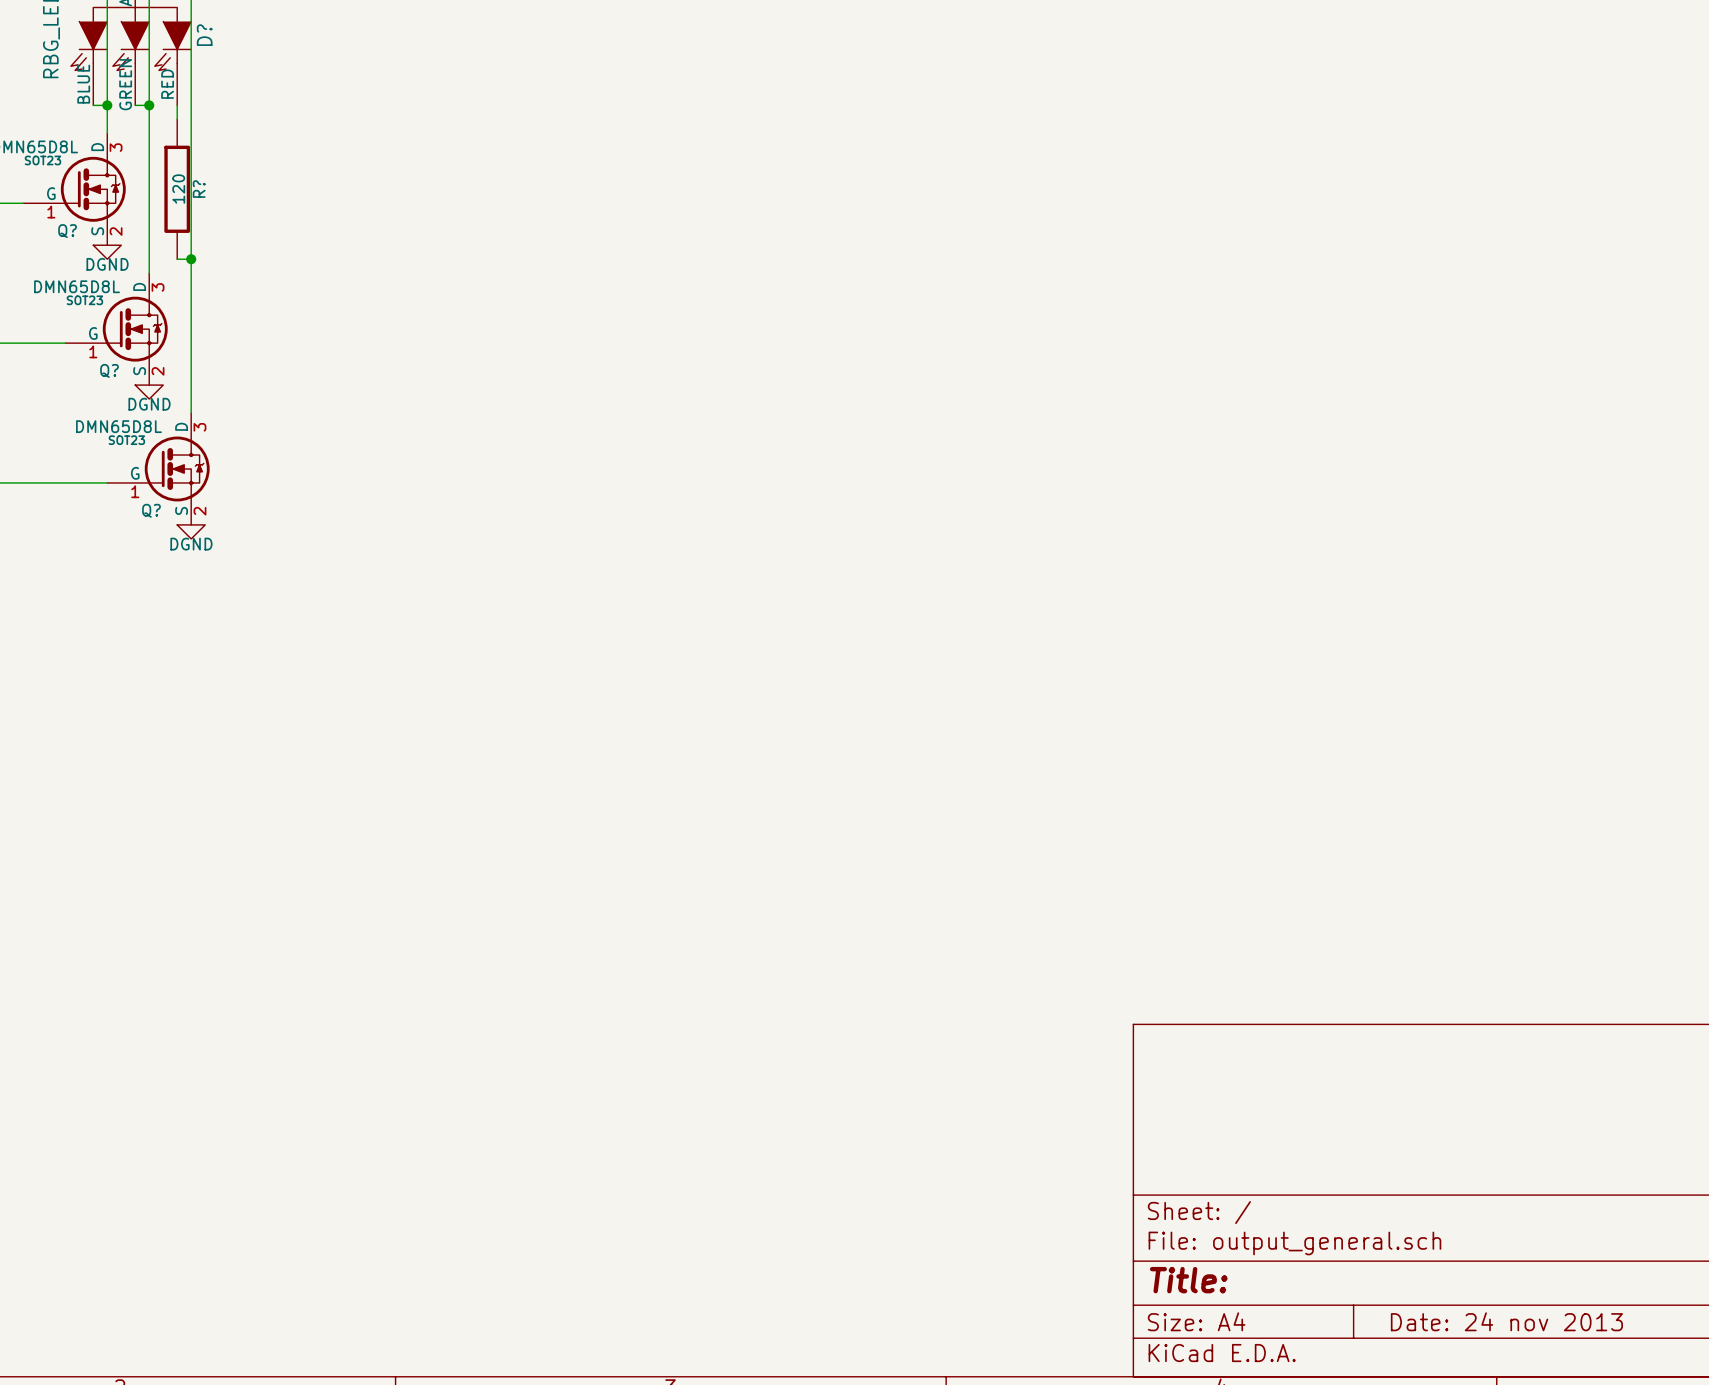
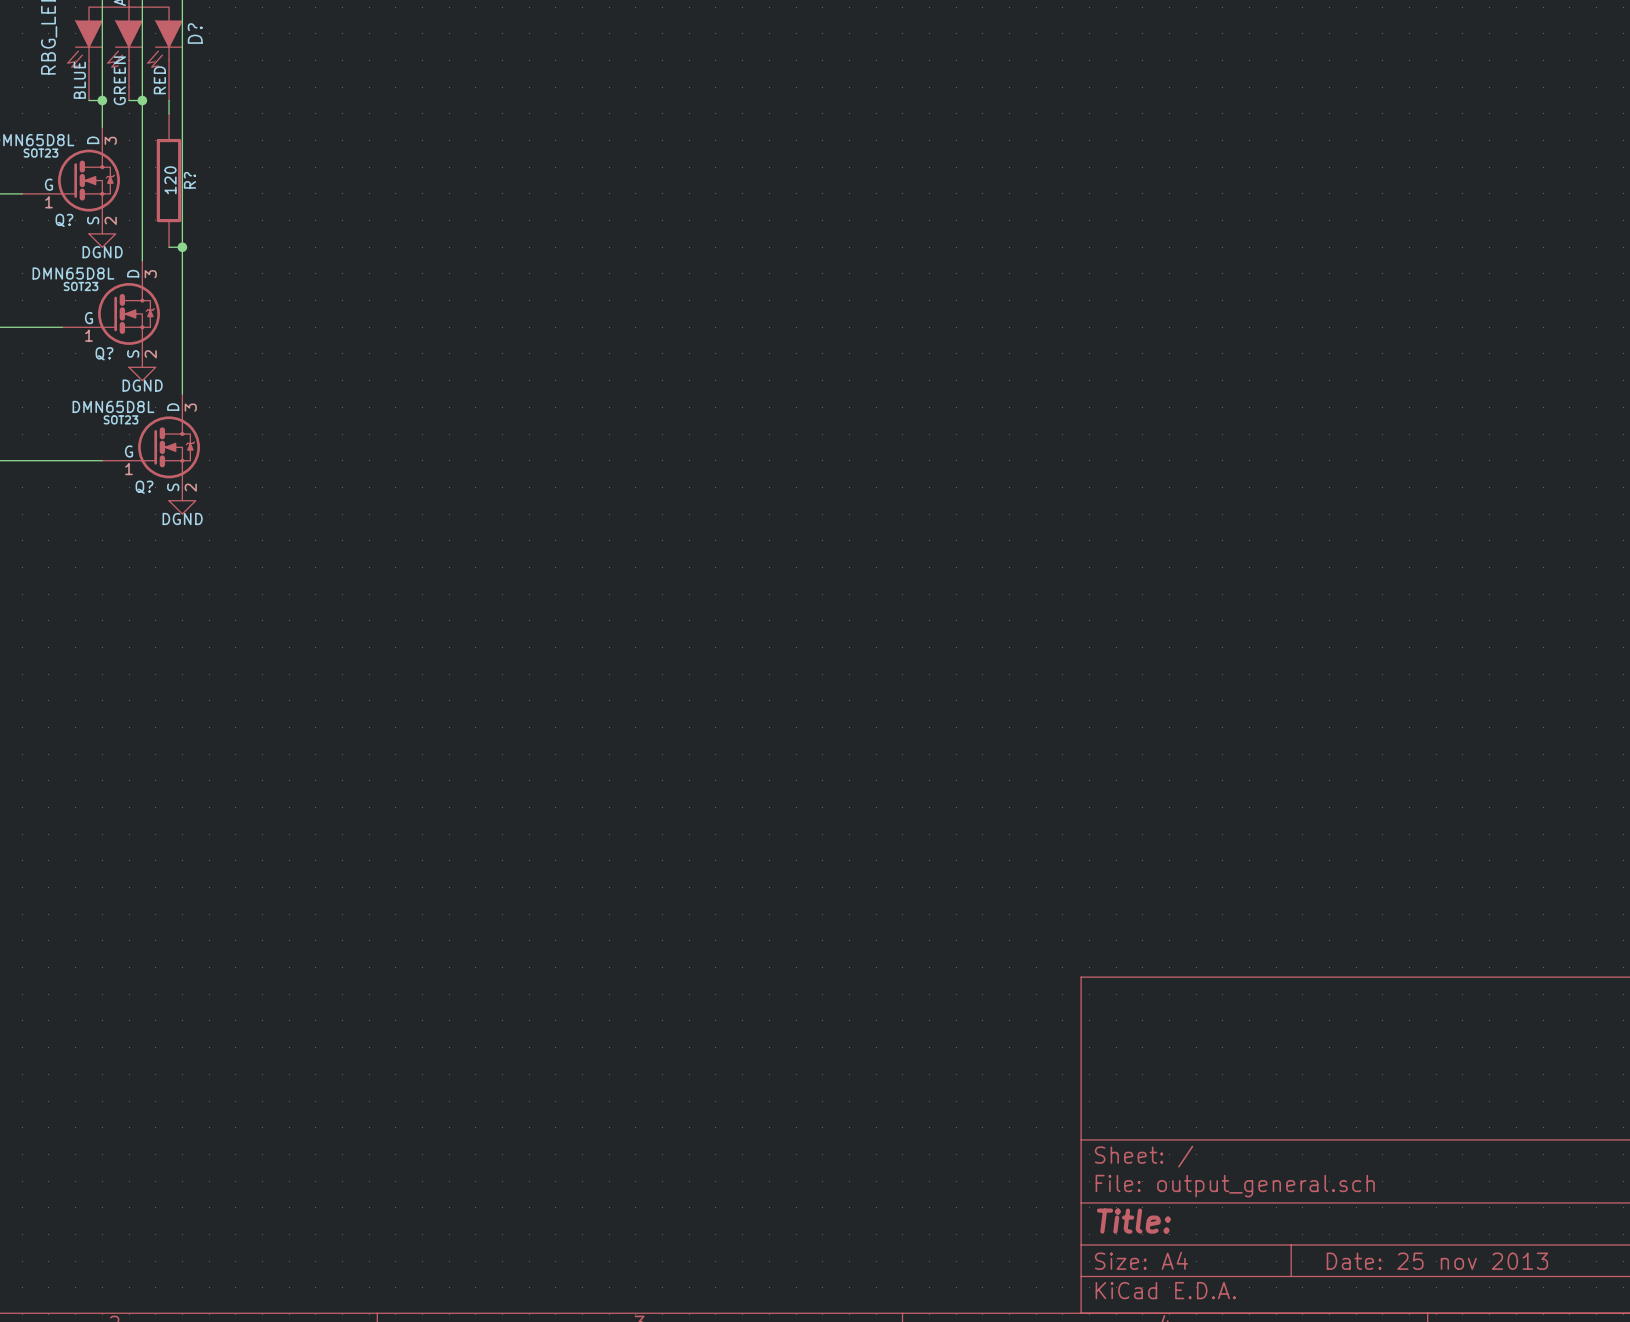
title block: Date: 24 nov 2013 (1506, 1321) -> Date: 25 nov 2013 (1437, 1261)

